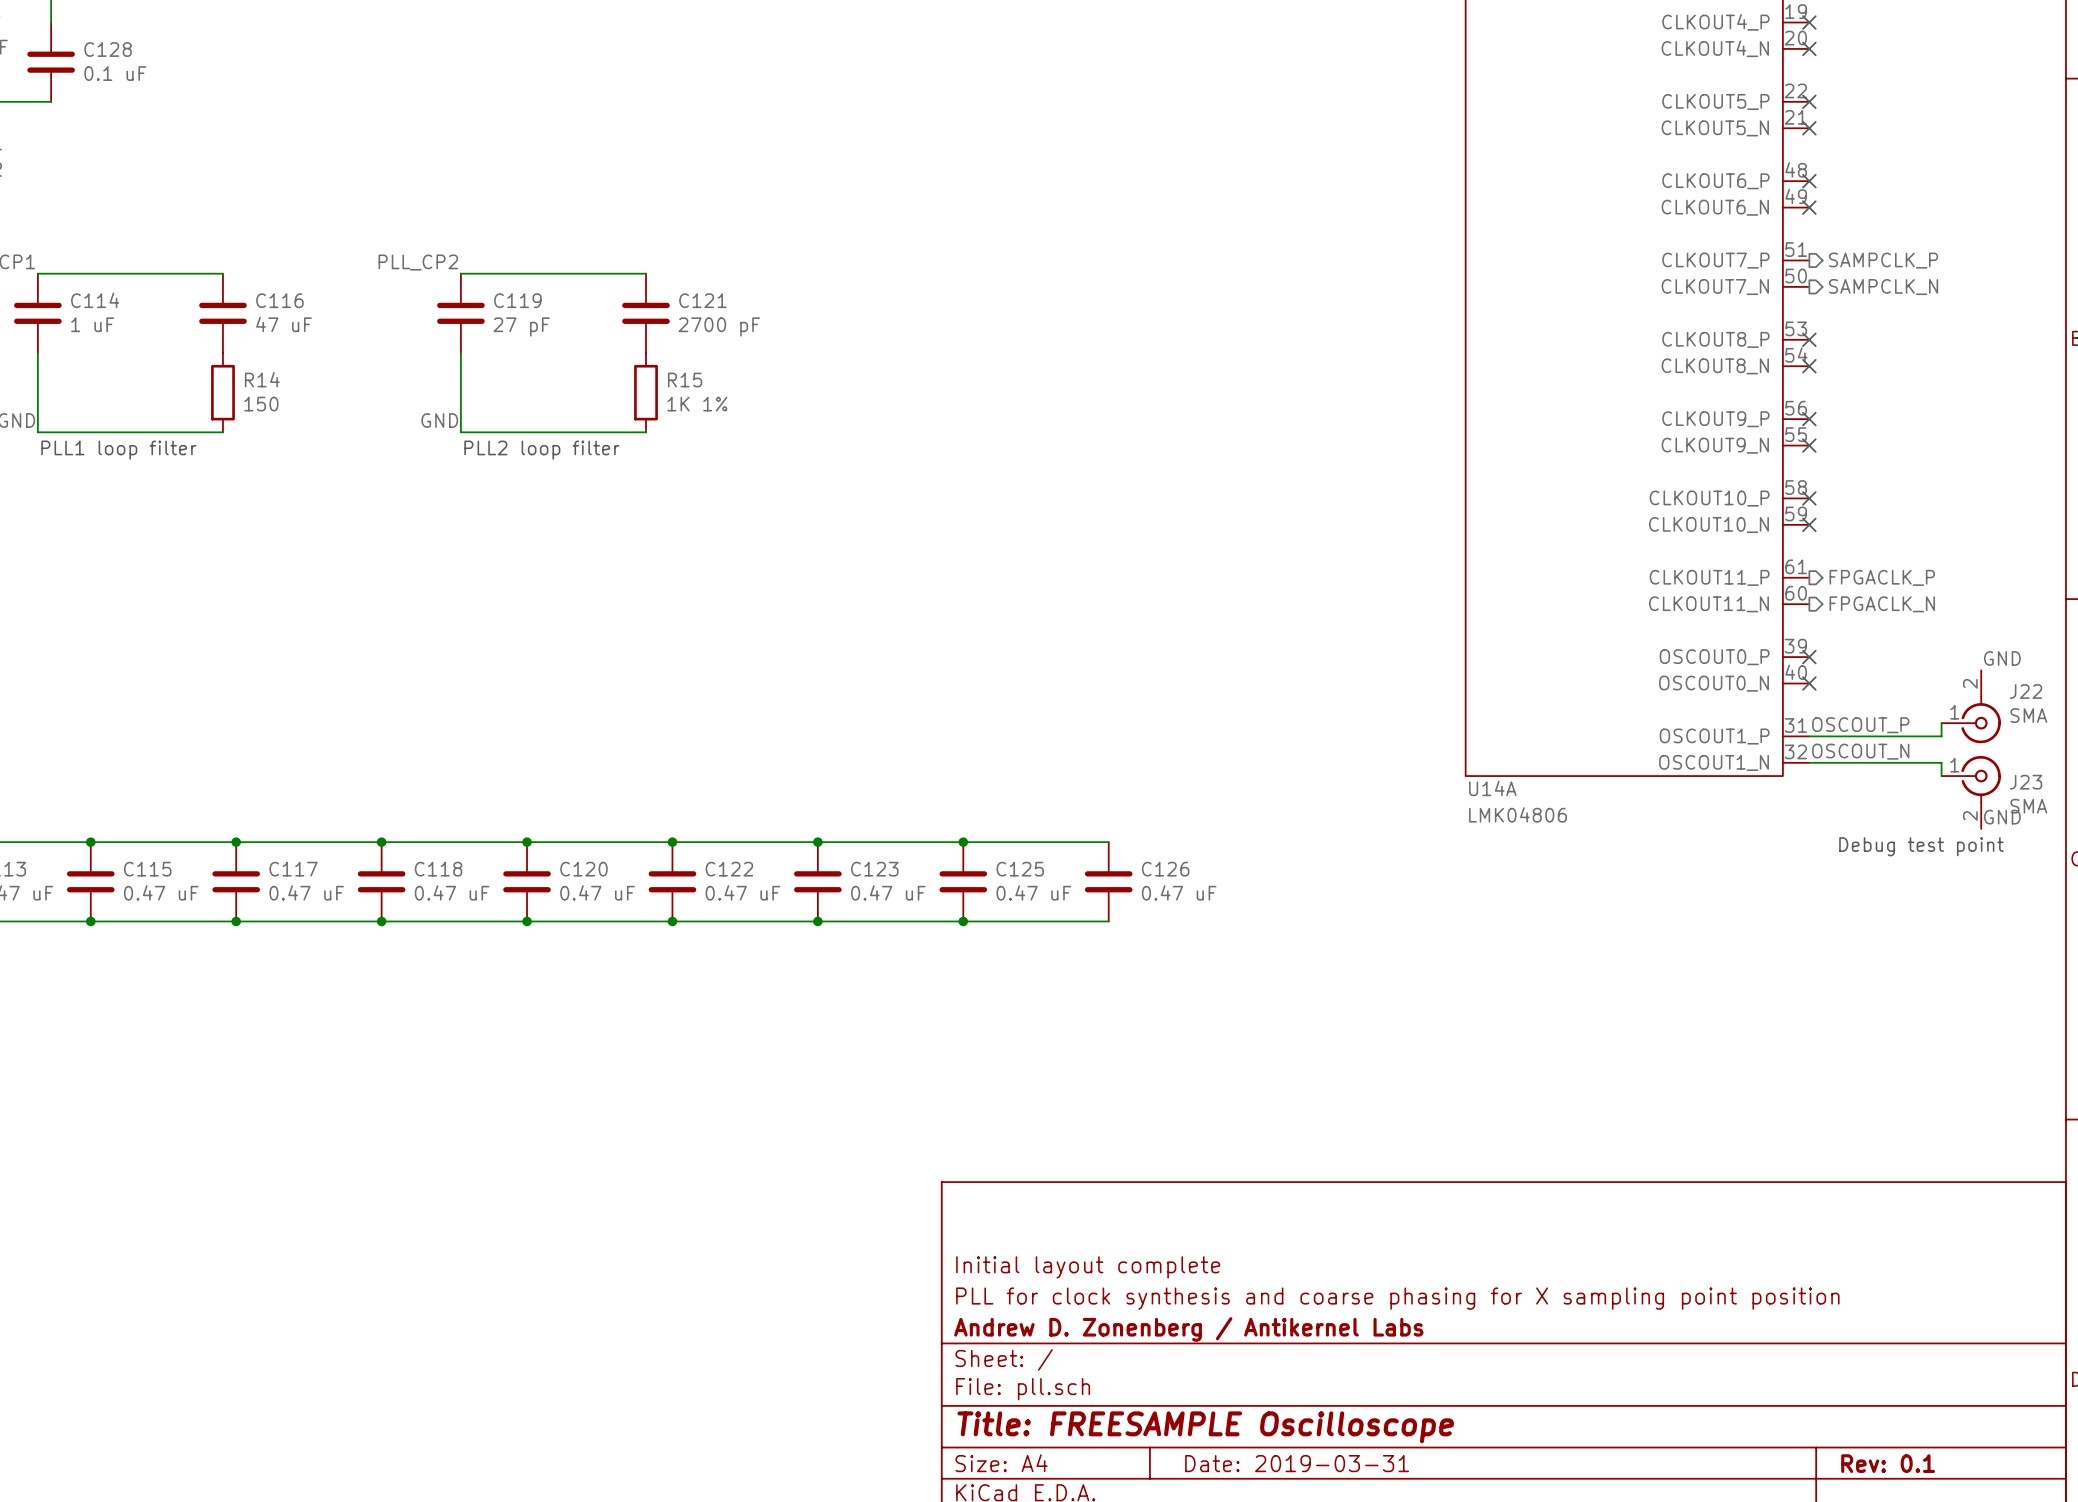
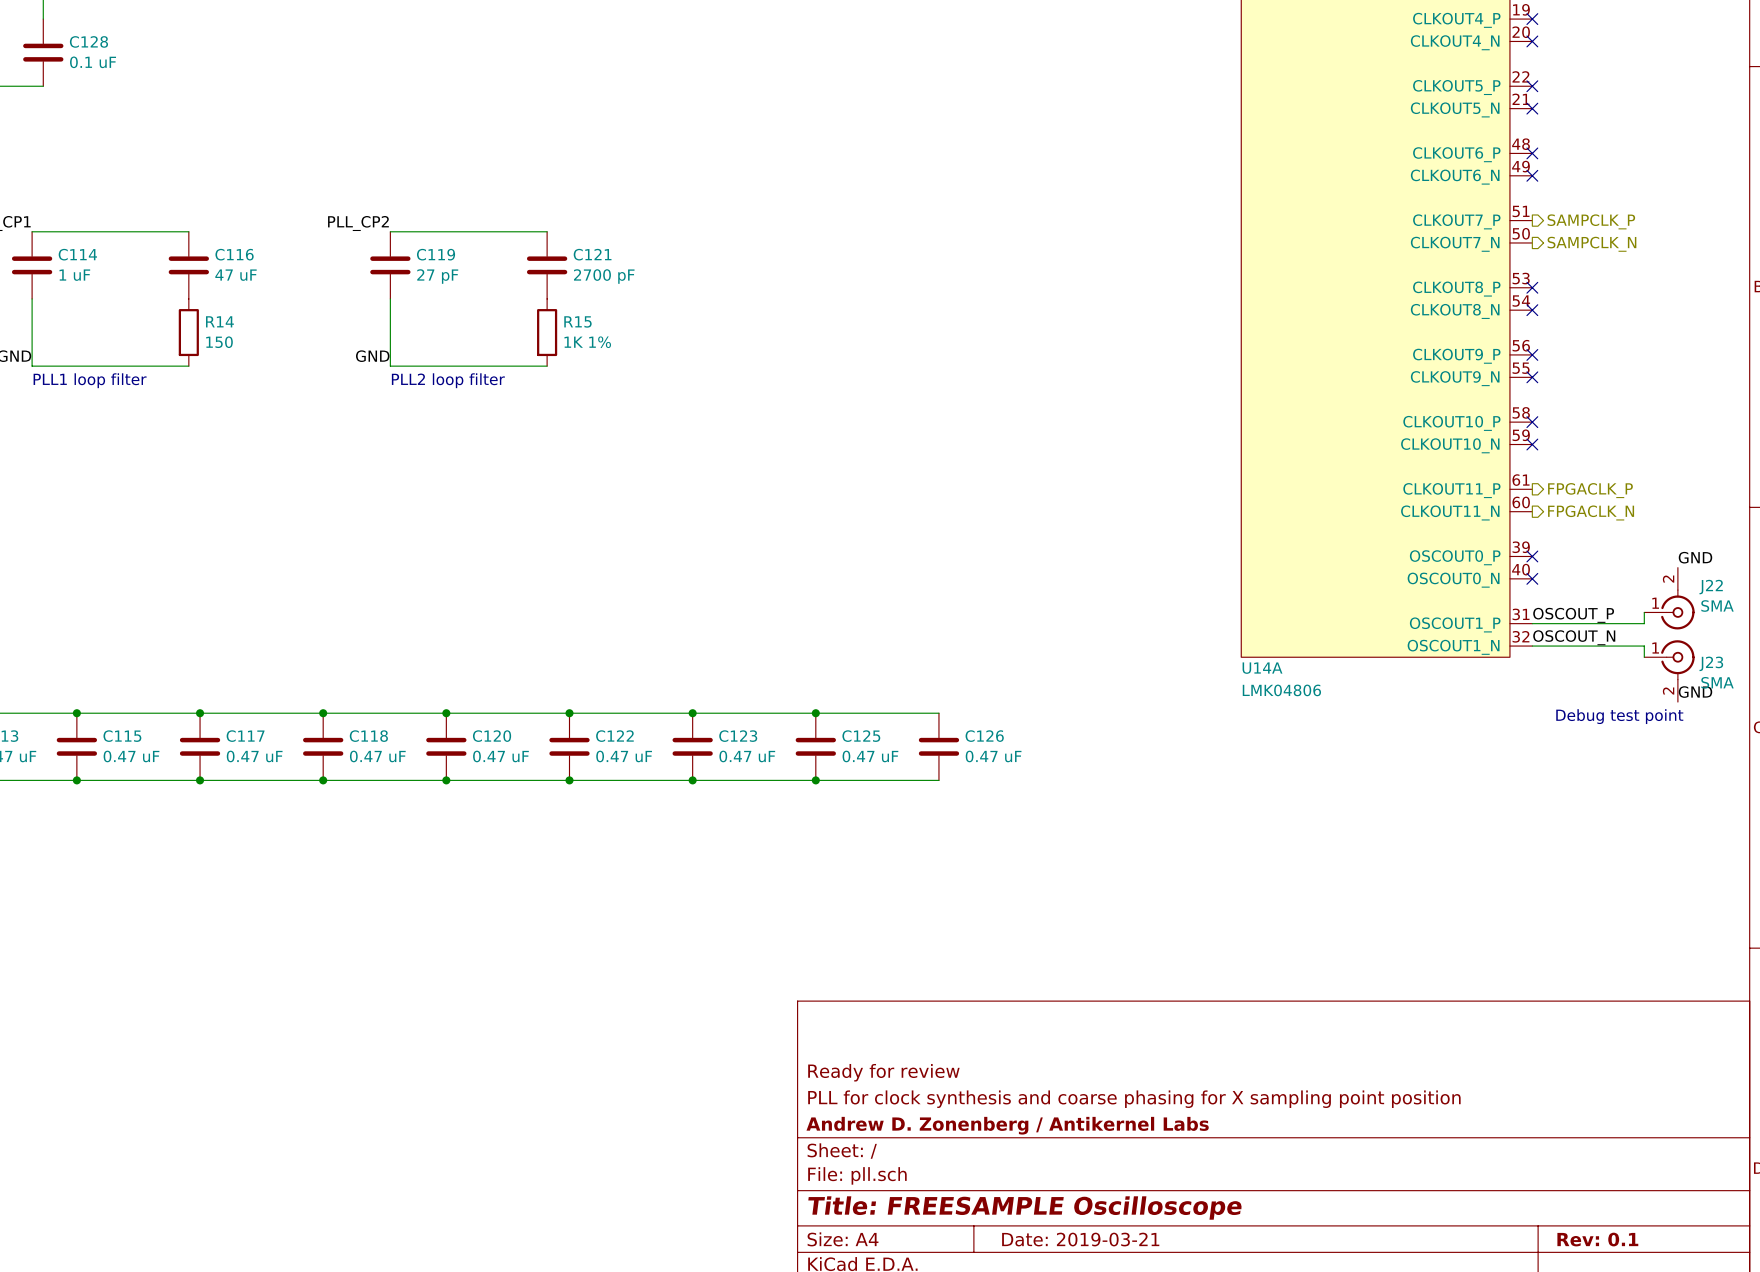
title block: Initial layout complete (1088, 1267) -> Ready for review (883, 1072)
title block: Date: 2019-03-31 (1297, 1463) -> Date: 2019-03-21 (1080, 1239)

